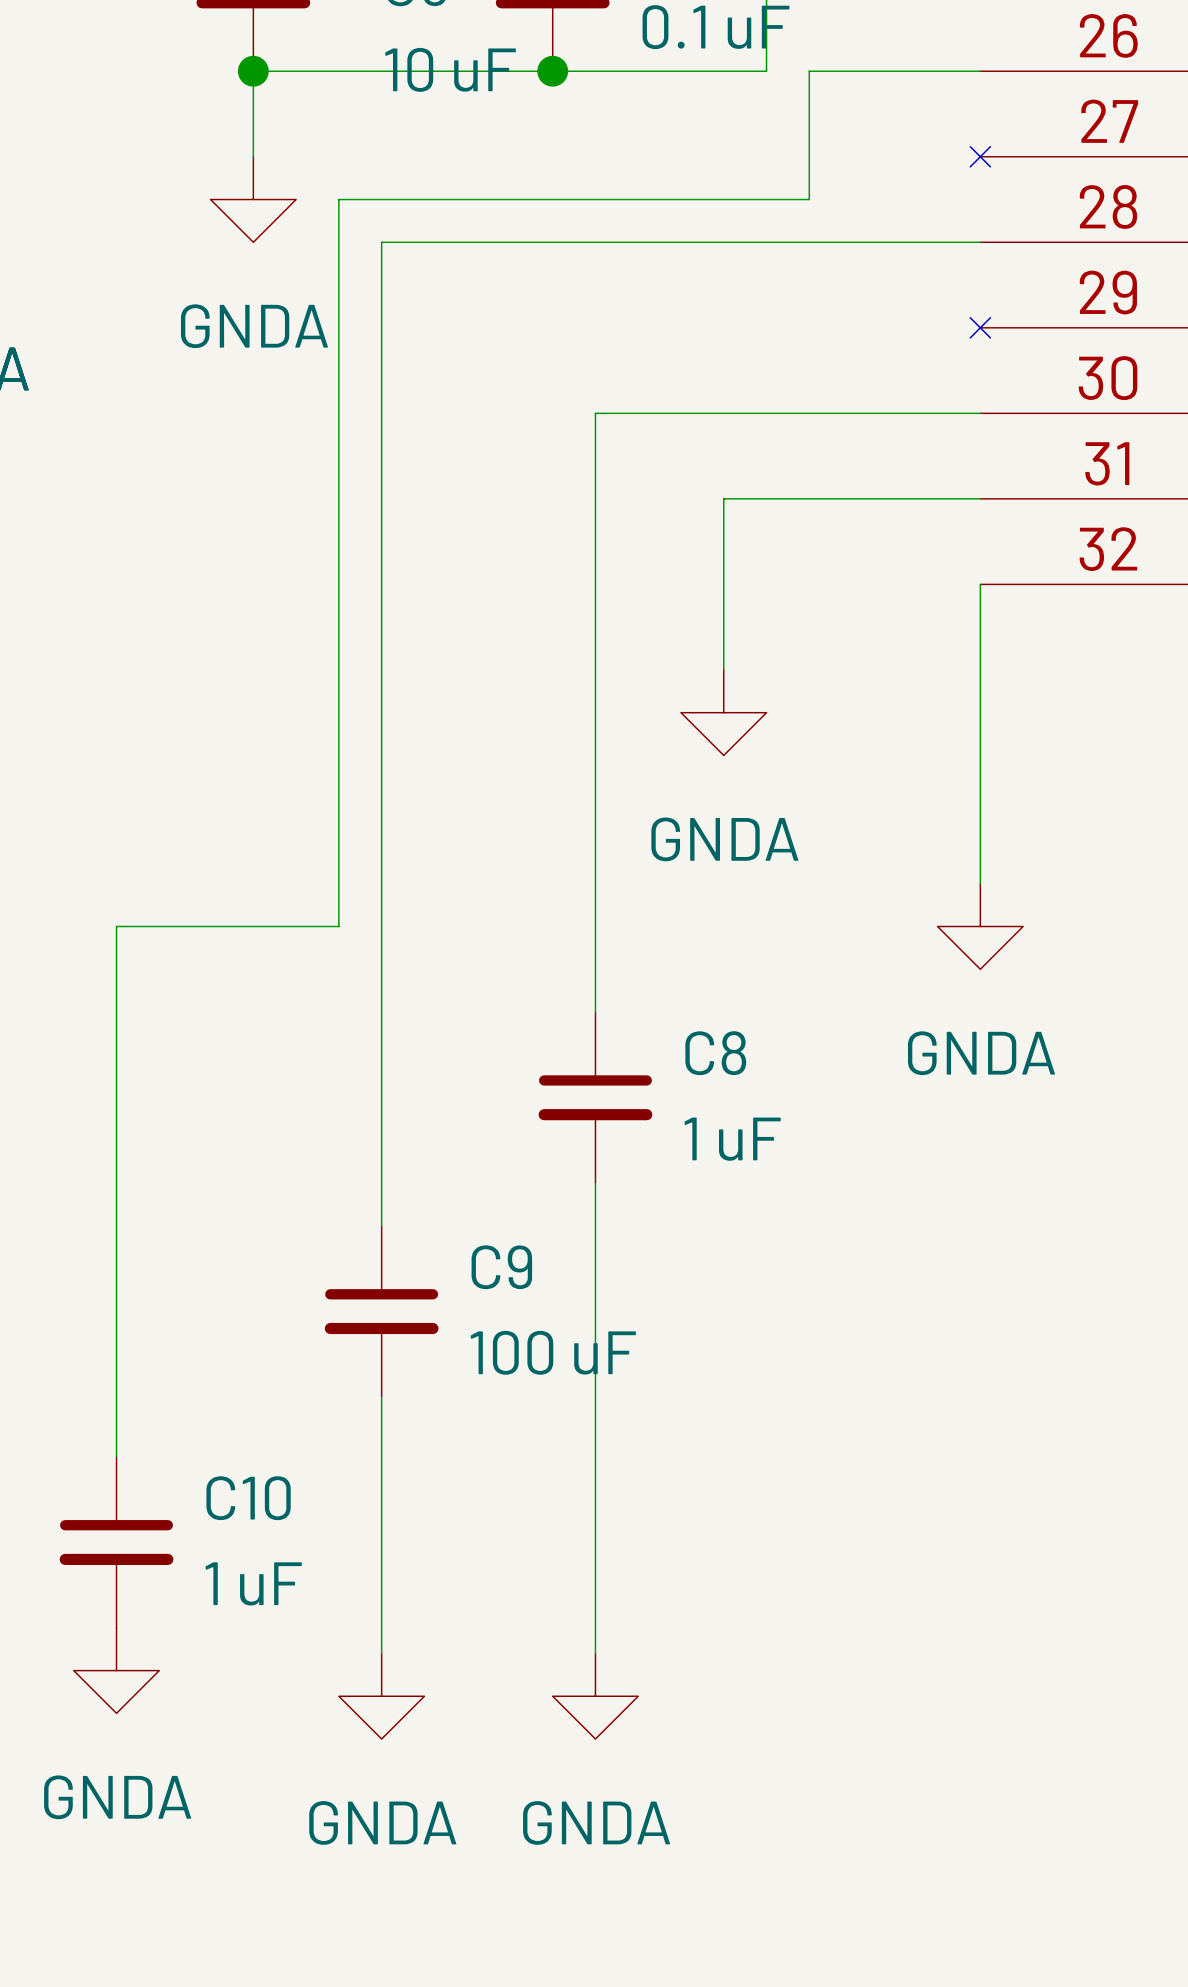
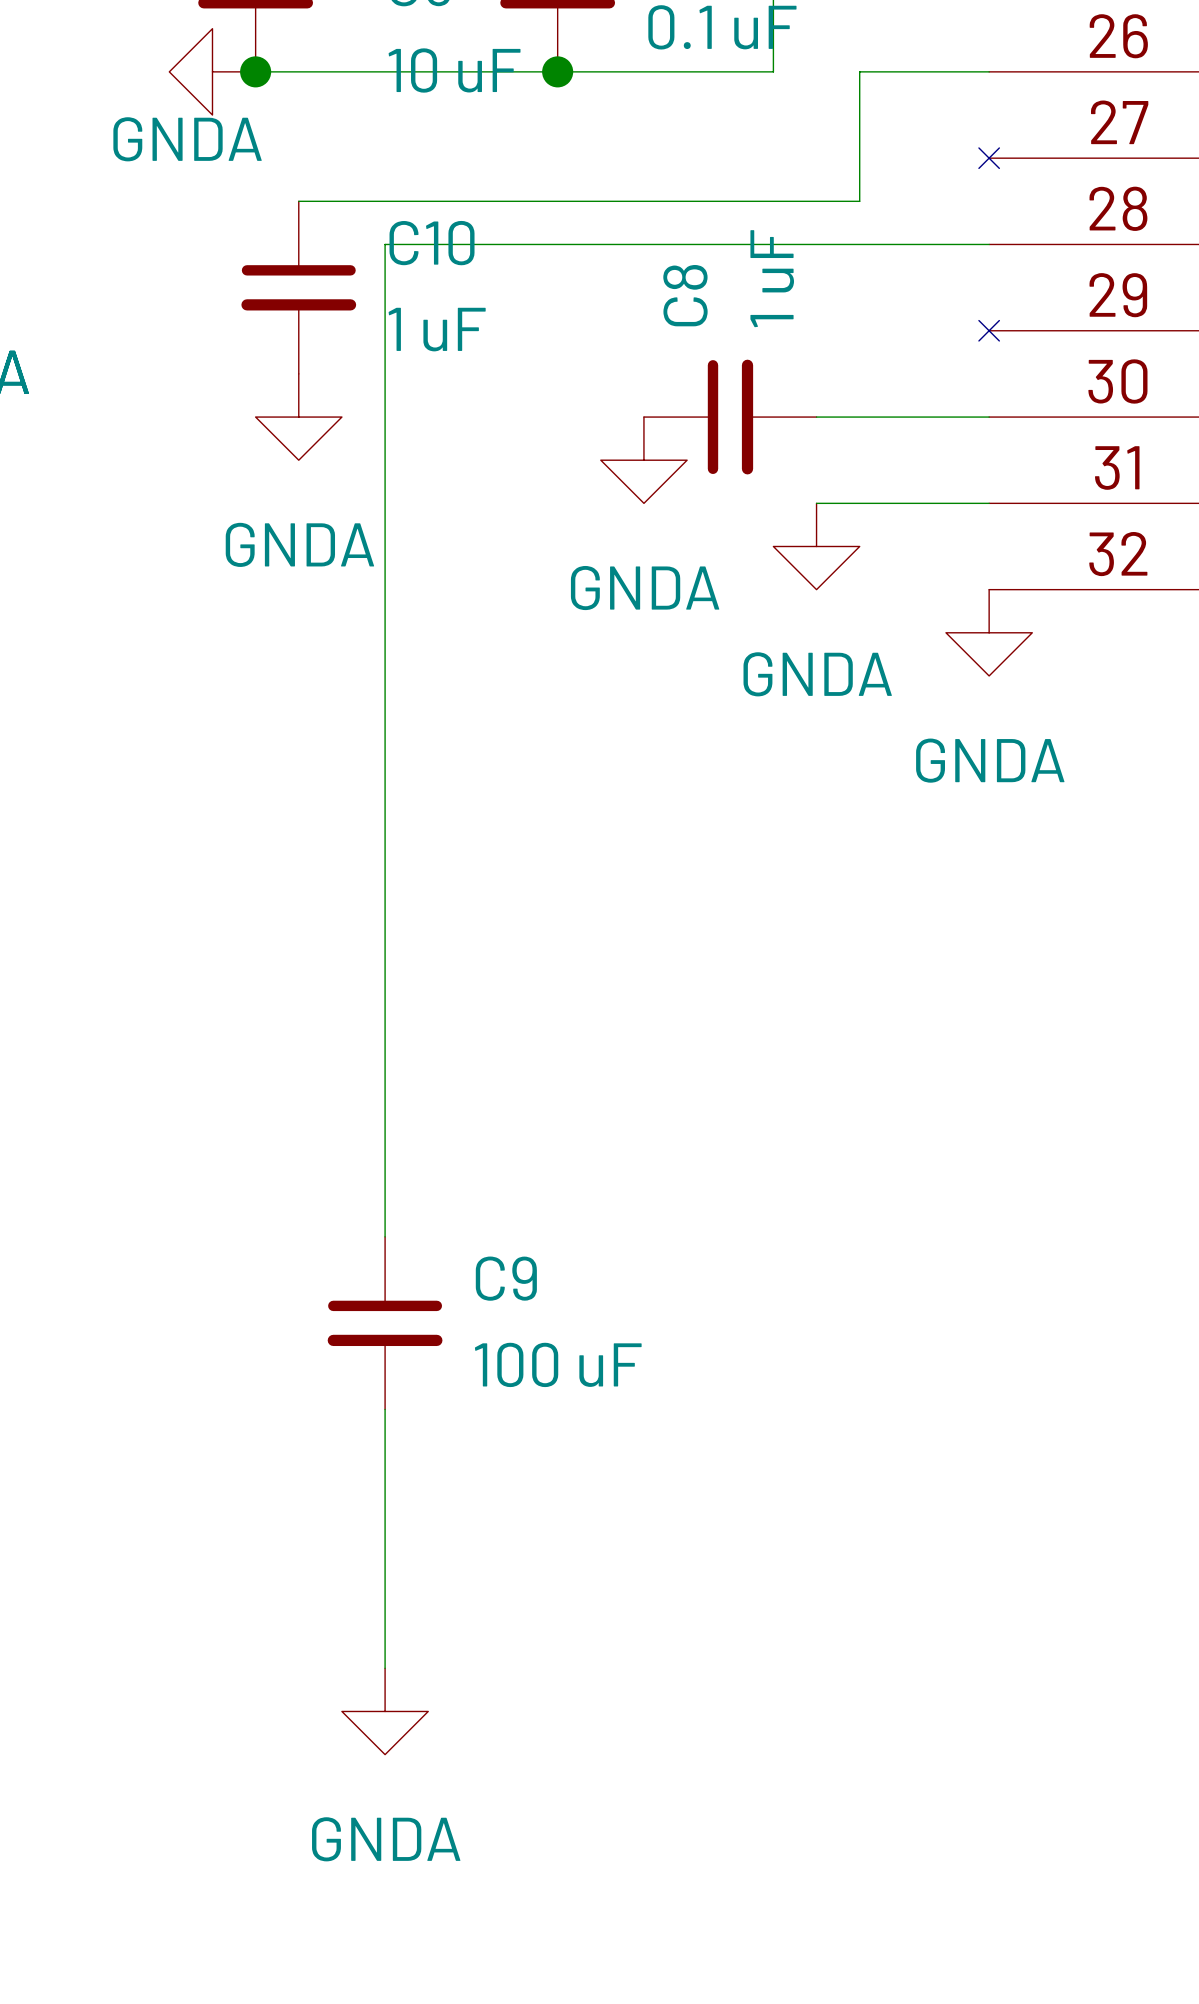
power symbol: none -> GNDA (212, 71)
wire: (253, 71) (253, 156) -> none
wire: (852, 71) (809, 71) (809, 199) -> (859, 71) (859, 201) (816, 201)
power symbol: GNDA (253, 199) -> none
wire: (338, 199) (338, 926) (116, 926) (116, 1456) -> (341, 201) (298, 201)
power symbol: none -> GNDA (298, 417)
wire: (809, 413) (595, 413) (595, 1012) -> none
power symbol: none -> GNDA (643, 460)
wire: (809, 498) (723, 498) (723, 669) -> none
power symbol: none -> GNDA (816, 546)
wire: (980, 584) (980, 883) -> none
power symbol: none -> GNDA (989, 632)
power symbol: GNDA (723, 712) -> none
power symbol: GNDA (980, 926) -> none
C8 rotation: 0° (595, 1097) -> 90° counterclockwise (730, 417)
C8 position: (595, 1097) -> (730, 417)
wire: (595, 1183) (595, 1653) -> none
C10 position: (116, 1542) -> (298, 287)
power symbol: GNDA (116, 1670) -> none
power symbol: GNDA (595, 1696) -> none

